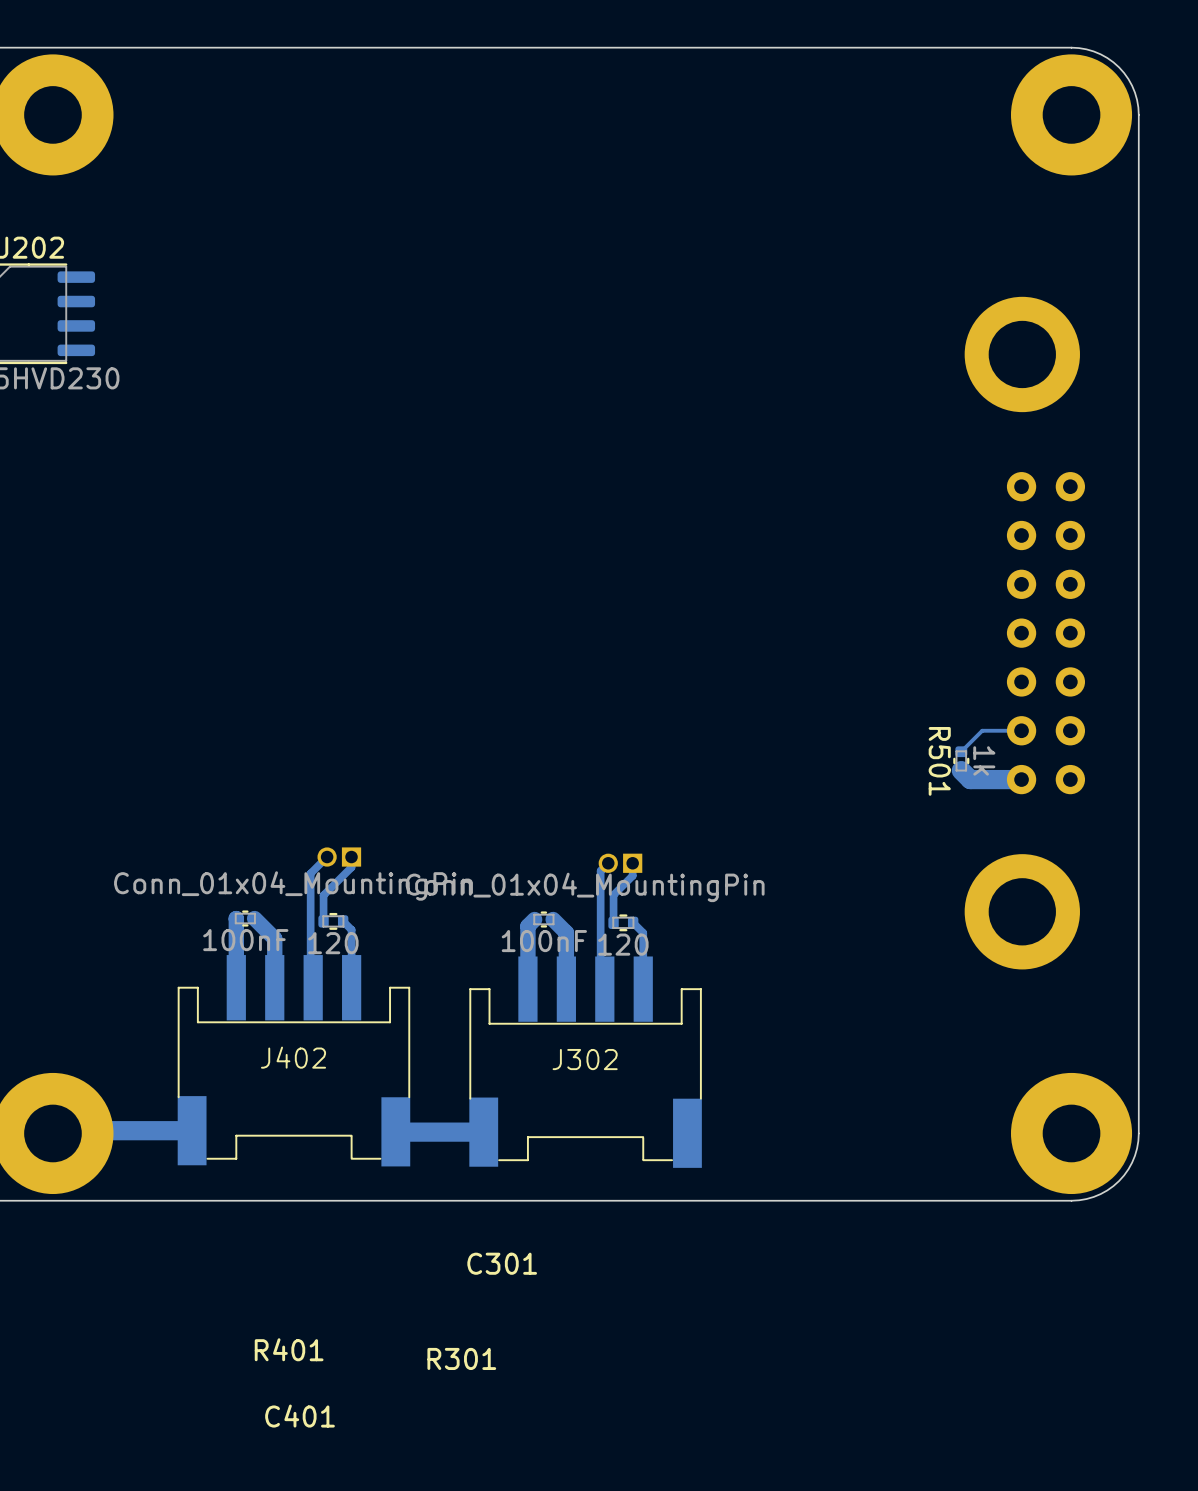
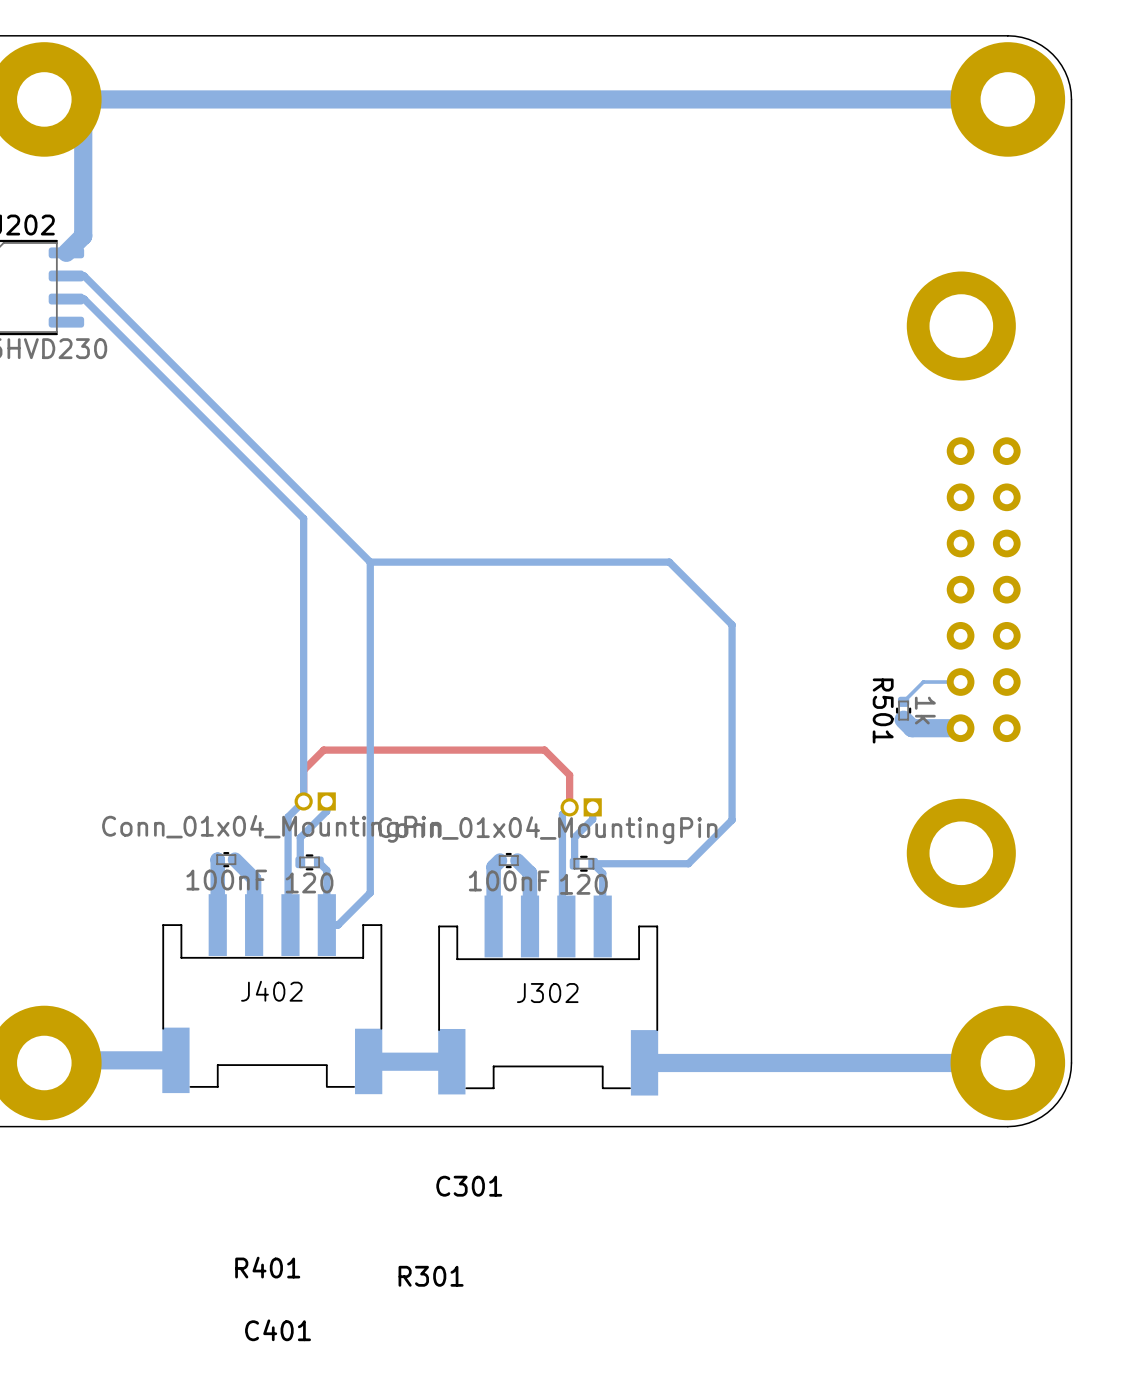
bottom track: none -> (1007, 99) (83, 99) (83, 236) (66, 252)
bottom track: none -> (66, 275) (84, 275) (370, 562)
bottom track: none -> (66, 299) (84, 299) (303, 518) (303, 801)
bottom track: none -> (370, 562) (370, 892) (338, 925) (326, 925)
bottom track: none -> (370, 562) (669, 562) (732, 624) (732, 820) (688, 863) (593, 863)
top track: none -> (303, 801) (303, 770) (323, 750) (544, 750) (569, 775) (569, 807)
bottom track: none -> (1007, 1062) (644, 1062)

